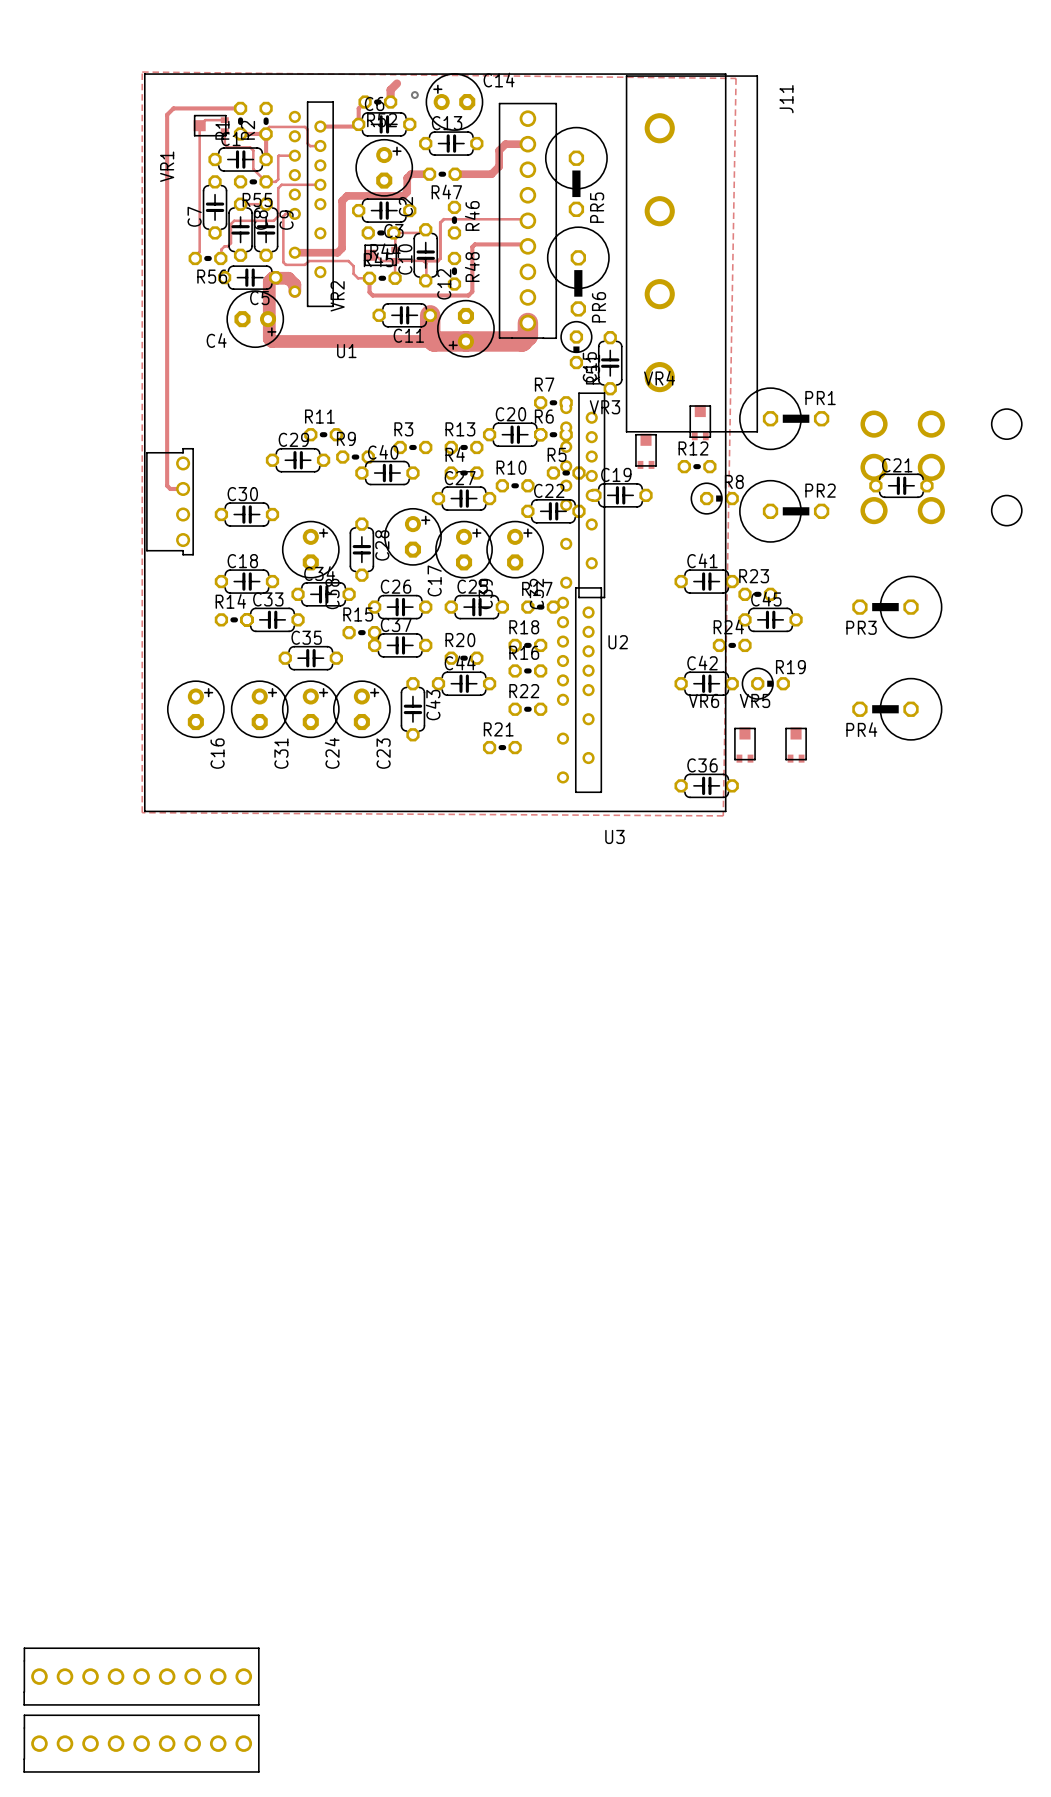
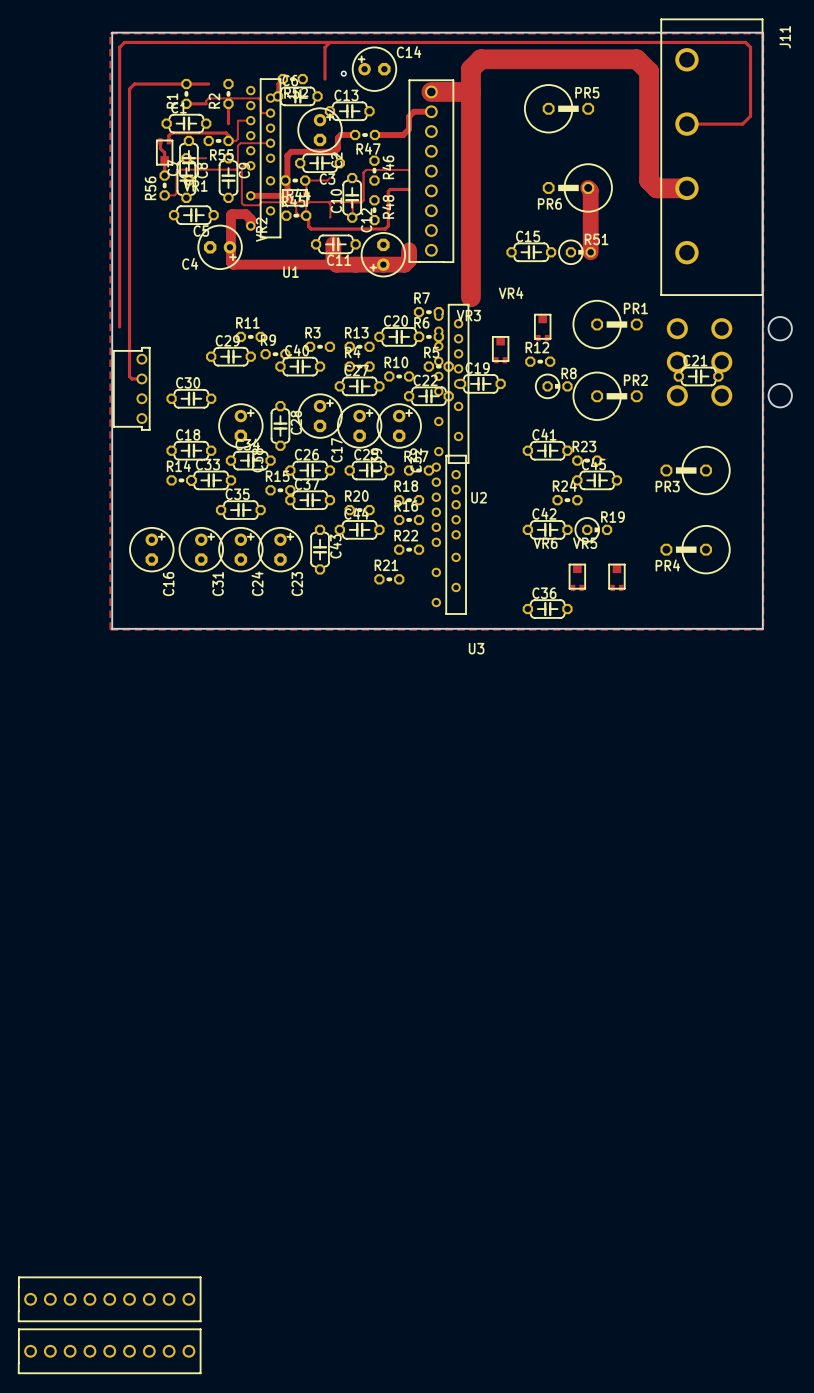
track: none -> (329, 42) (324, 47) (324, 79)
zone outline: (142, 72) (736, 78) (723, 815) (142, 812) -> (110, 55) (110, 33) (763, 33) (763, 629) (110, 629)
board edge: (144, 74) (725, 74) (725, 811) -> (112, 57) (112, 32) (762, 32) (762, 628) (562, 628)
track: (397, 83) (390, 89) (390, 102) -> none
via position: (414, 95) -> (343, 73)
C14 position: (454, 102) -> (374, 69)
track: none -> (431, 91) (470, 91)
track: (224, 120) (205, 120) (199, 125) (199, 252) (195, 258) -> none
R2 position: (266, 121) -> (228, 93)
VR1 rotation: 0° (211, 125) -> 90° counterclockwise (164, 151)
VR1 position: (211, 125) -> (164, 151)
track: (305, 126) (307, 129) (307, 143) (310, 146) (320, 146) -> (236, 98) (258, 98) (260, 100) (260, 111) (262, 113) (270, 113)
track: (320, 126) (349, 126) -> (248, 143) (270, 143)
track: (224, 131) (224, 144) (227, 147) (250, 147) (253, 150) (253, 169) (266, 181) (275, 181) (278, 179) (278, 155) (294, 155) -> none
track: (266, 133) (266, 159) -> (228, 103) (228, 123)
track: (527, 144) (505, 144) (499, 150) (499, 166) (491, 174) -> (431, 111) (414, 111) (409, 116) (409, 129) (403, 135) (380, 135)
track: none -> (250, 120) (237, 121) (237, 138) (235, 140) (228, 140) (228, 135) (226, 133) (171, 133) (168, 135) (168, 141)
track: none -> (686, 124) (742, 124) (750, 116) (750, 47) (745, 42) (124, 42) (119, 47) (119, 326)
C2 position: (384, 167) -> (320, 130)
PR5 rotation: 0° (576, 171) -> 90° counterclockwise (559, 108)
PR5 position: (576, 171) -> (559, 108)
track: (429, 174) (411, 174) (407, 178) (407, 192) (403, 195) -> (352, 135) (340, 135) (337, 137) (337, 148) (334, 151) (312, 151)
R47 position: (442, 174) -> (365, 135)
track: (458, 174) (483, 174) -> none
R55 position: (253, 181) -> (218, 140)
track: none -> (160, 141) (160, 148) (164, 152) (164, 175)
track: (310, 184) (281, 184) (278, 188) (278, 216) (273, 220) (234, 220) (230, 224) (230, 243) (221, 249) (220, 258) -> (240, 143) (237, 145) (237, 167) (235, 169) (179, 169) (176, 172) (176, 193) (174, 195) (164, 195)
track: (375, 195) (347, 195) (342, 201) (342, 248) (337, 252) -> (291, 151) (287, 155) (287, 192) (283, 195) (261, 195)
U1 position: (311, 204) -> (263, 158)
C7 position: (215, 207) -> (188, 160)
C3 position: (384, 210) -> (320, 163)
track: (294, 213) (285, 213) (283, 216) (283, 262) (285, 264) (305, 264) (308, 261) (337, 261) -> (250, 165) (241, 167) (241, 203) (243, 205) (258, 205) (261, 202)
track: (472, 219) (443, 219) (440, 222) (440, 258) (437, 261) (423, 260) -> (366, 169) (363, 172) (363, 200) (361, 202) (350, 202)
R46 position: (454, 220) -> (374, 170)
part position: (527, 220) -> (431, 171)
C9 position: (266, 229) -> (228, 178)
track: none -> (588, 187) (590, 190) (590, 252)
track: none -> (686, 188) (656, 188) (649, 180) (649, 71) (636, 59) (480, 59) (470, 69) (470, 297)
track: (503, 244) (474, 244) (472, 246) (472, 291) (468, 295) -> (390, 189) (388, 191) (388, 226) (385, 229) (363, 229)
track: (294, 252) (323, 252) -> (186, 84) (208, 84)
J11 position: (691, 253) -> (711, 157)
C10 position: (425, 255) -> (352, 197)
R56 rotation: 0° (208, 258) -> 90° clockwise (164, 185)
track: none -> (350, 202) (352, 204) (352, 217)
track: none -> (350, 202) (328, 202)
track: (348, 261) (353, 266) (353, 273) (358, 278) (369, 278) (369, 292) (372, 295) (401, 295) -> (270, 202) (292, 202) (296, 206) (296, 212) (299, 215) (308, 215) (308, 226) (311, 229)
R48 position: (454, 271) -> (374, 210)
PR6 rotation: 0° (578, 271) -> 90° clockwise (577, 187)
PR6 position: (578, 271) -> (577, 187)
track: (294, 291) (294, 284) (288, 278) (273, 277) (269, 281) (269, 338) (271, 341) (300, 341) -> (250, 225) (250, 219) (245, 214) (230, 215) (230, 262) (232, 264)
C11 position: (404, 315) -> (335, 244)
C4 position: (255, 319) -> (220, 247)
C12 position: (465, 328) -> (383, 254)
R51 rotation: 0° (576, 345) -> 90° counterclockwise (577, 252)
R51 position: (576, 345) -> (577, 252)
C15 rotation: 0° (610, 363) -> 90° clockwise (531, 252)
C15 position: (610, 363) -> (531, 252)

